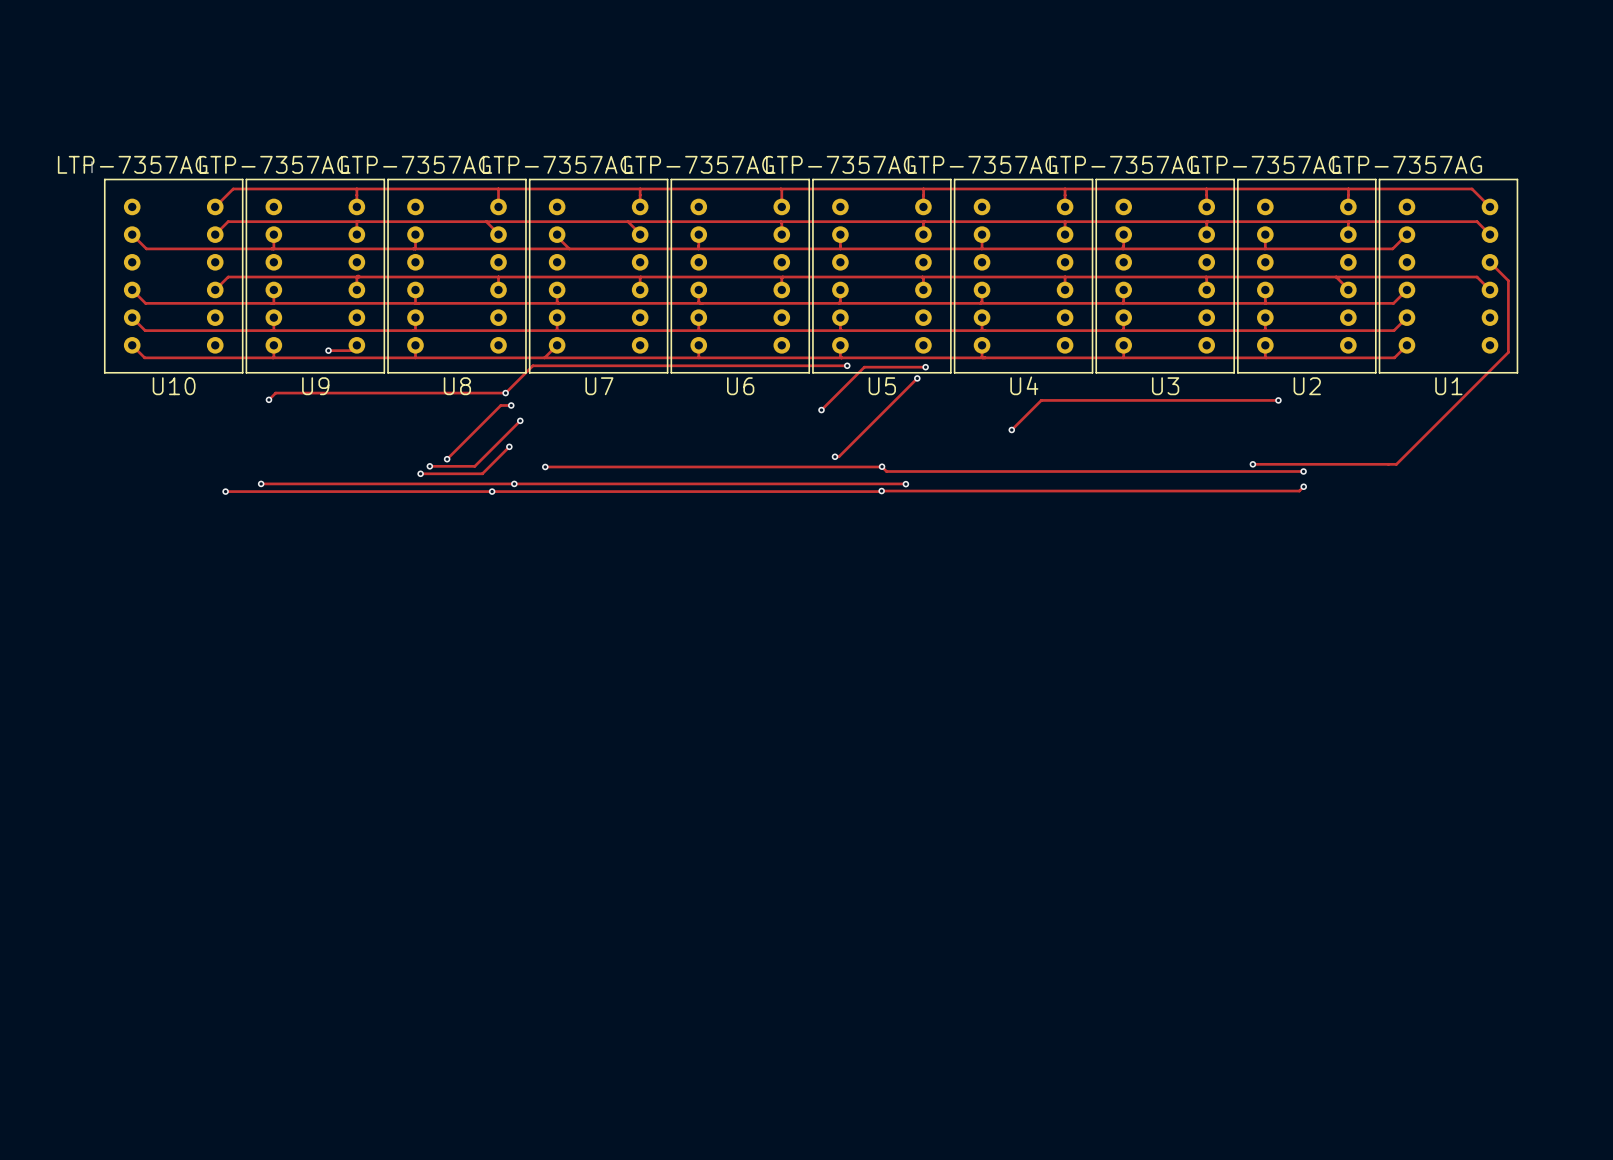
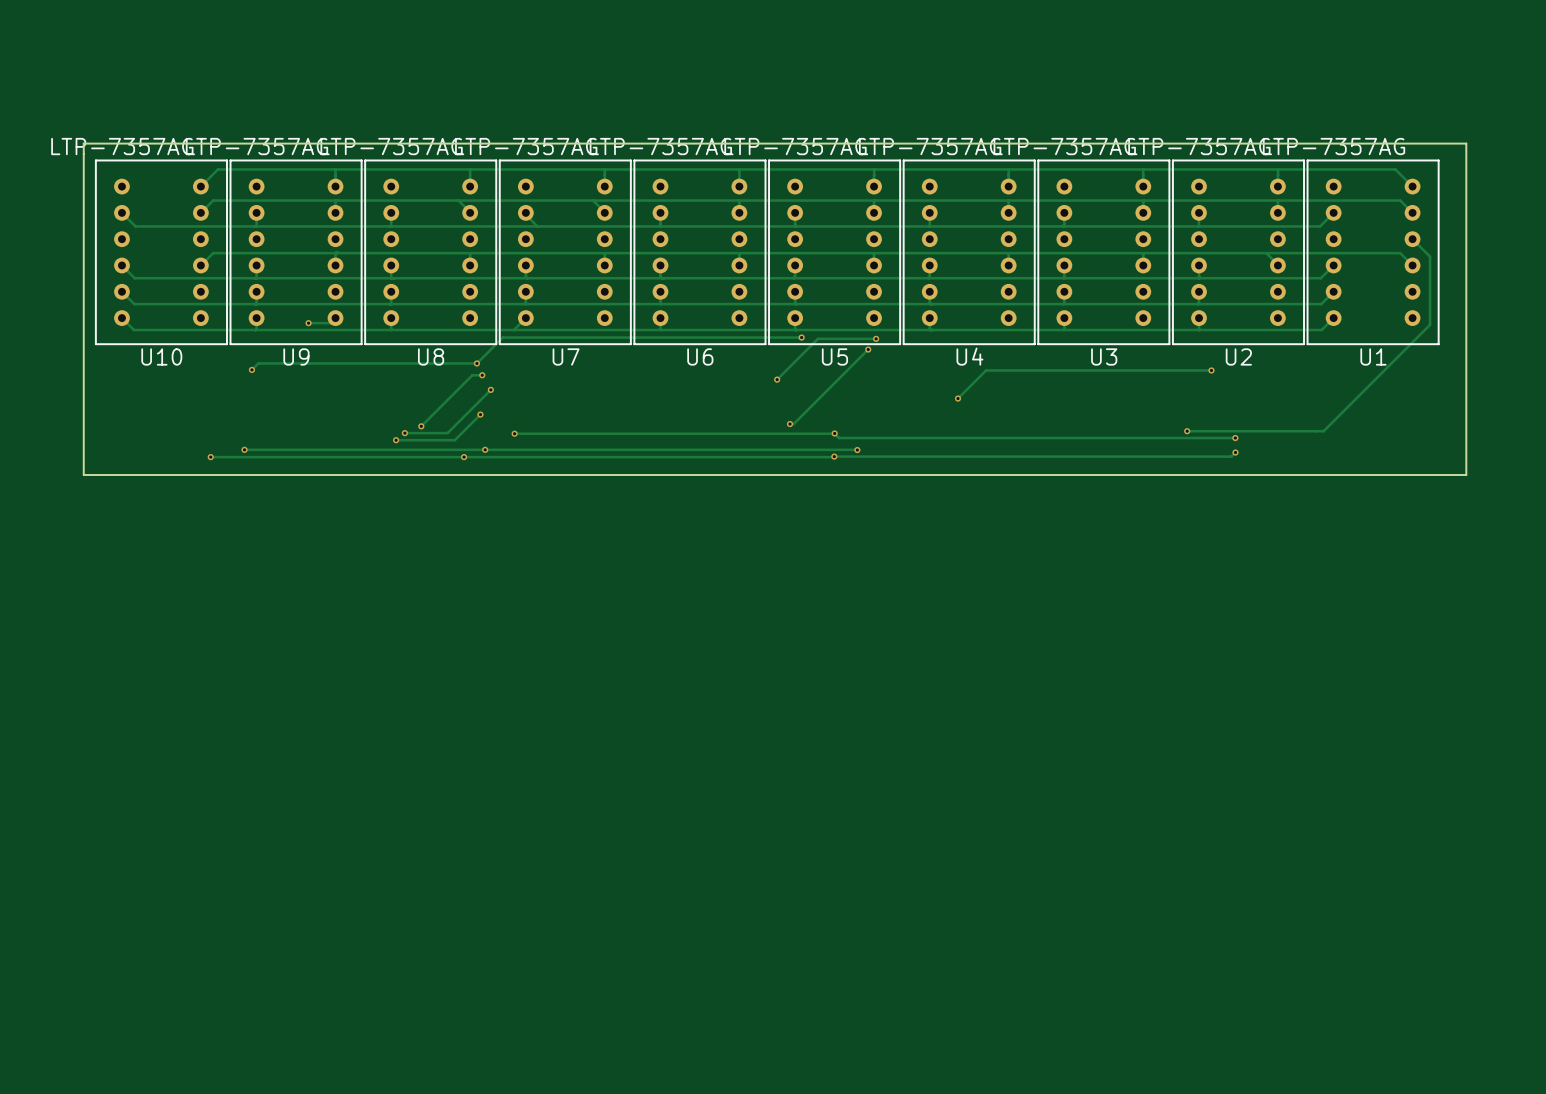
board edge: none -> (83, 143) (1466, 143) (1466, 474) (83, 474) (83, 153)

